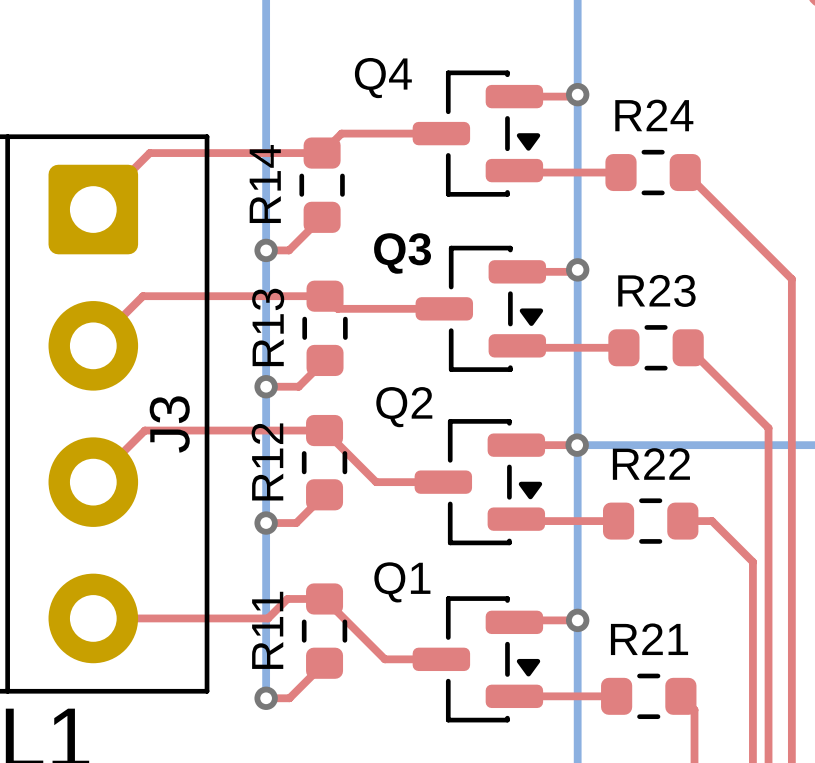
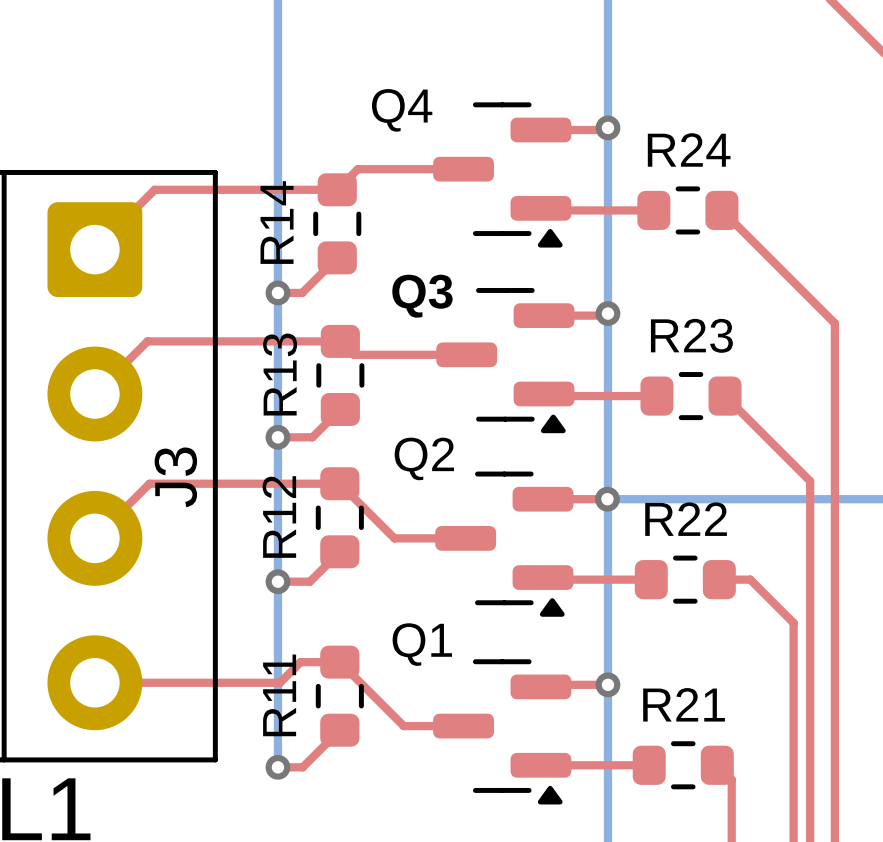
Q4 footprint: [412, 70, 544, 197] -> [433, 102, 572, 248]
Q3 footprint: [415, 245, 547, 372] -> [436, 287, 575, 434]
Q2 footprint: [414, 419, 546, 546] -> [435, 471, 574, 617]
Q1 footprint: [412, 596, 544, 723] -> [433, 659, 572, 805]

